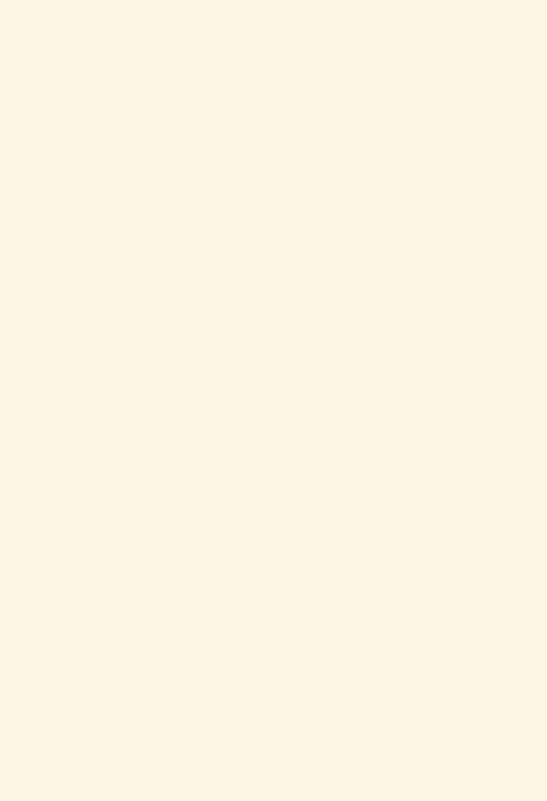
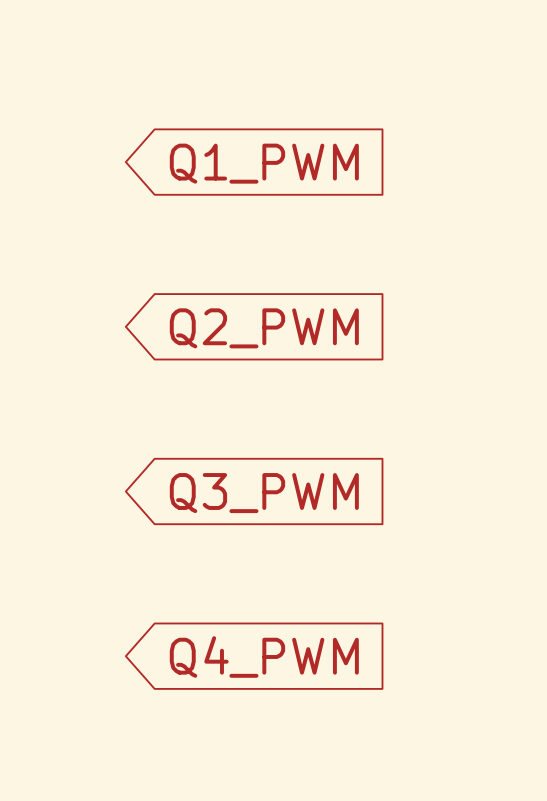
global label: none -> Q1_PWM (264, 163)
global label: none -> Q2_PWM (264, 328)
global label: none -> Q3_PWM (264, 493)
global label: none -> Q4_PWM (264, 656)

